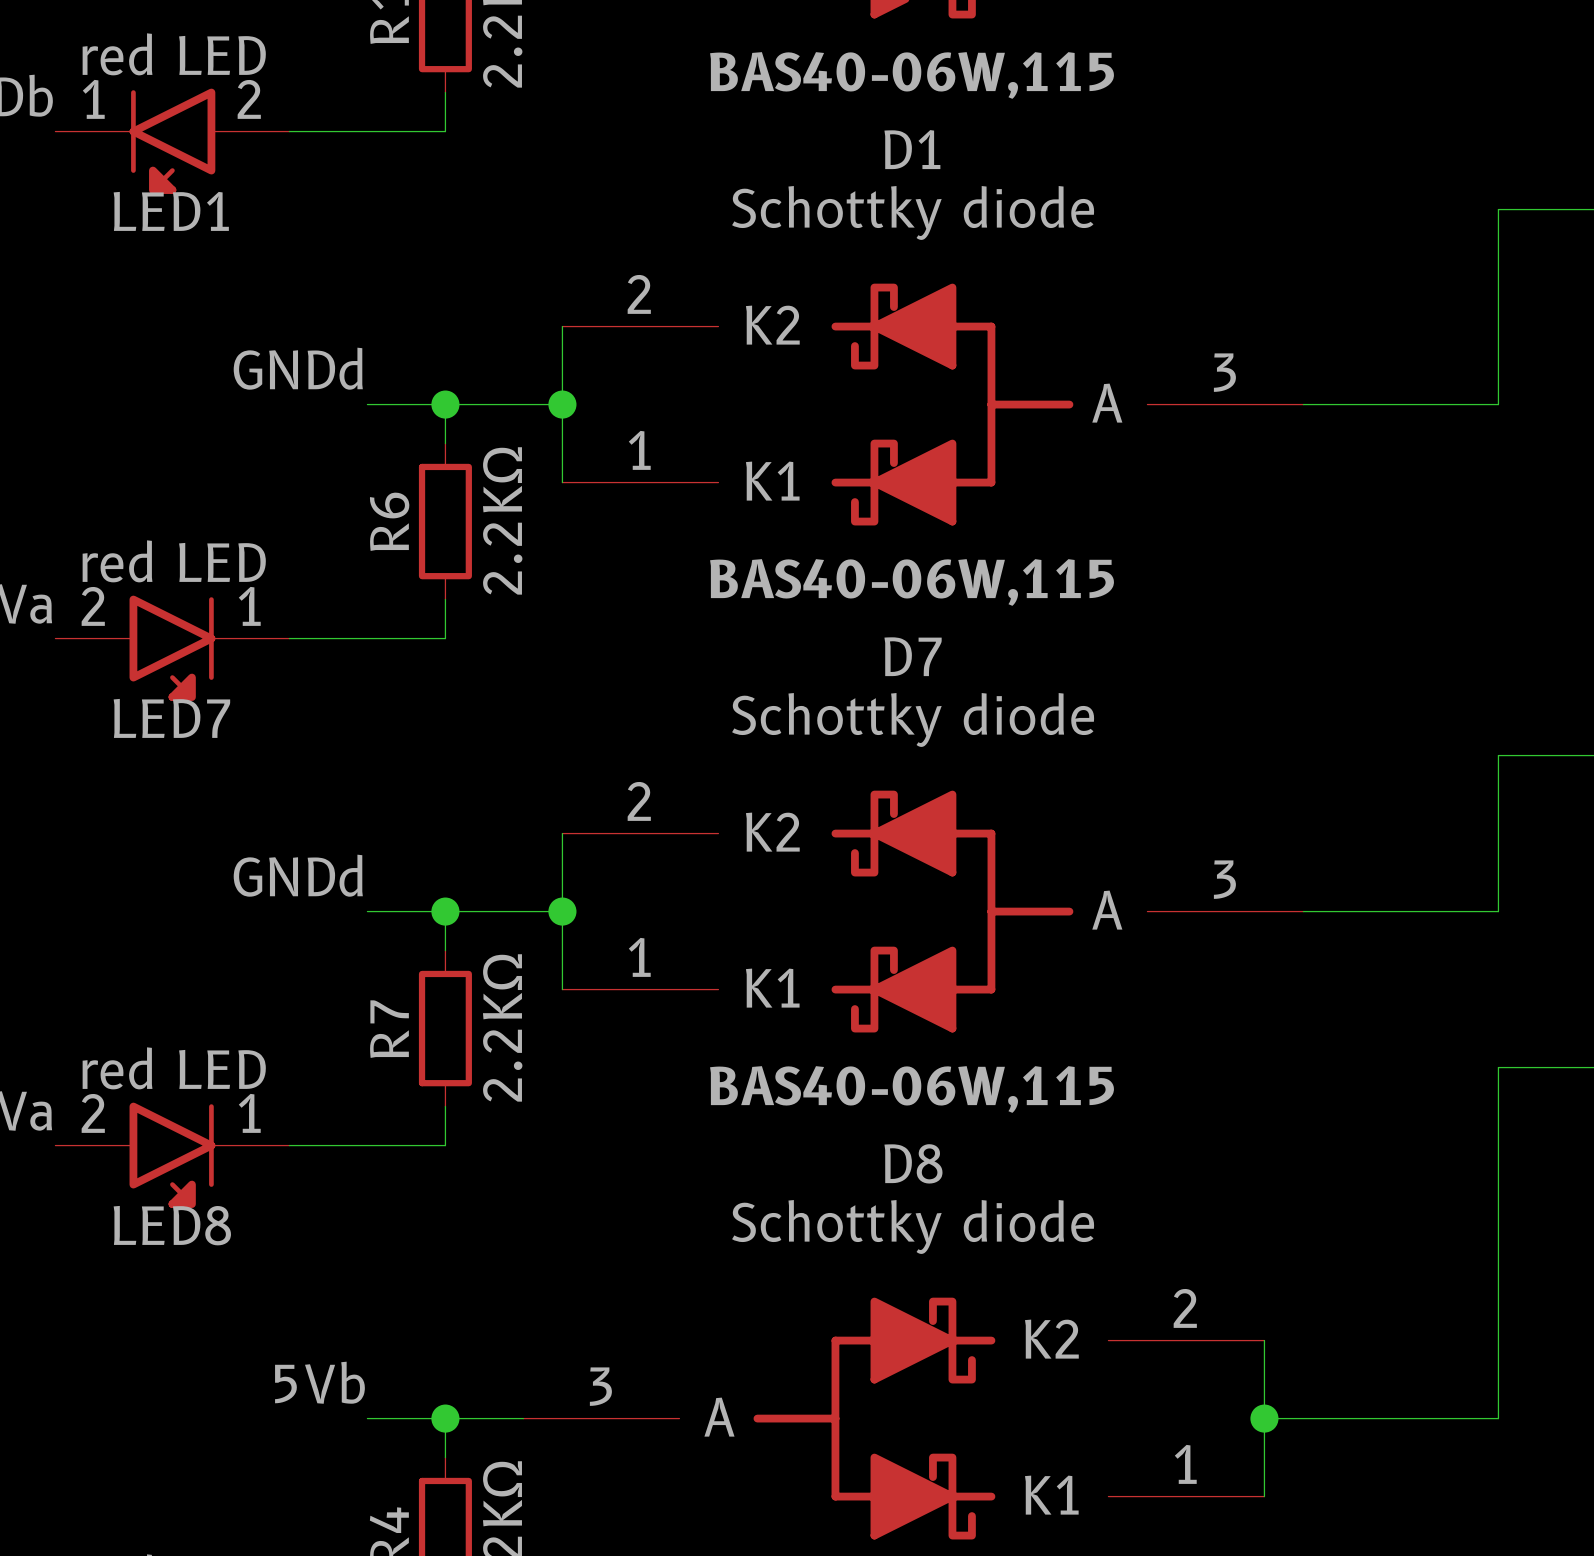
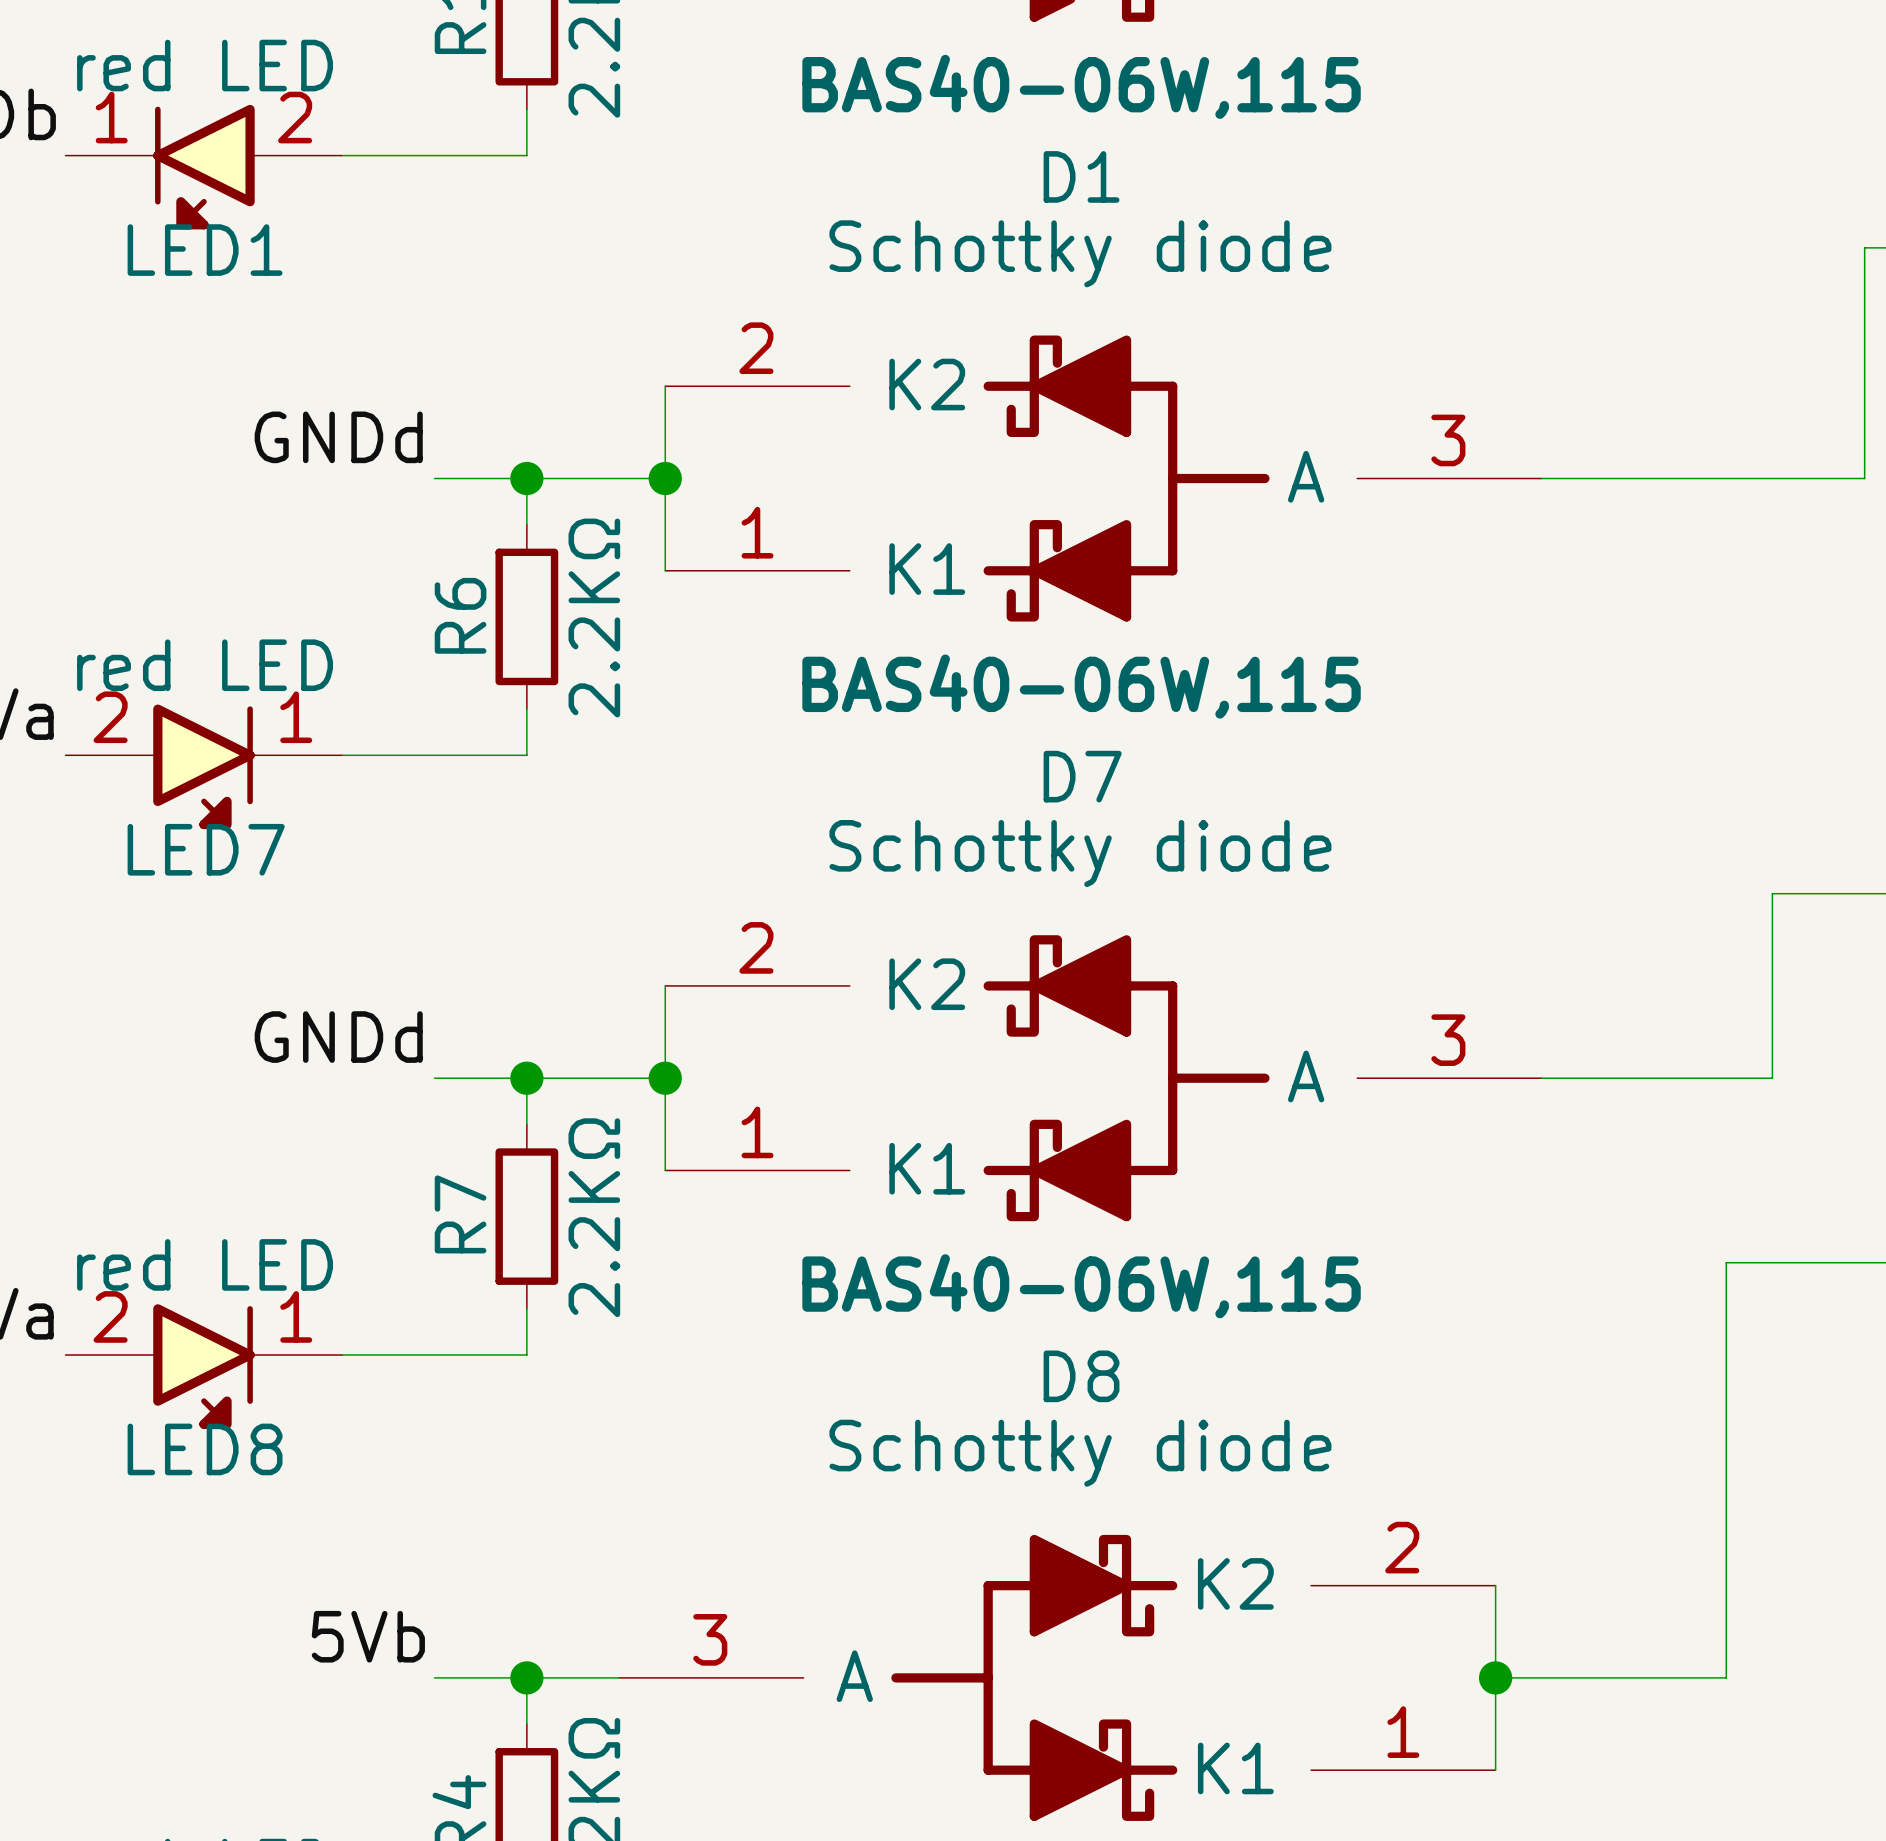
wire: (1576, 209) (1498, 209) (1498, 404) -> (1864, 247) (1864, 478) (1772, 478)
wire: (1498, 1067) (1498, 1418) (1459, 1418) -> (1772, 1262) (1726, 1262) (1726, 1677)

